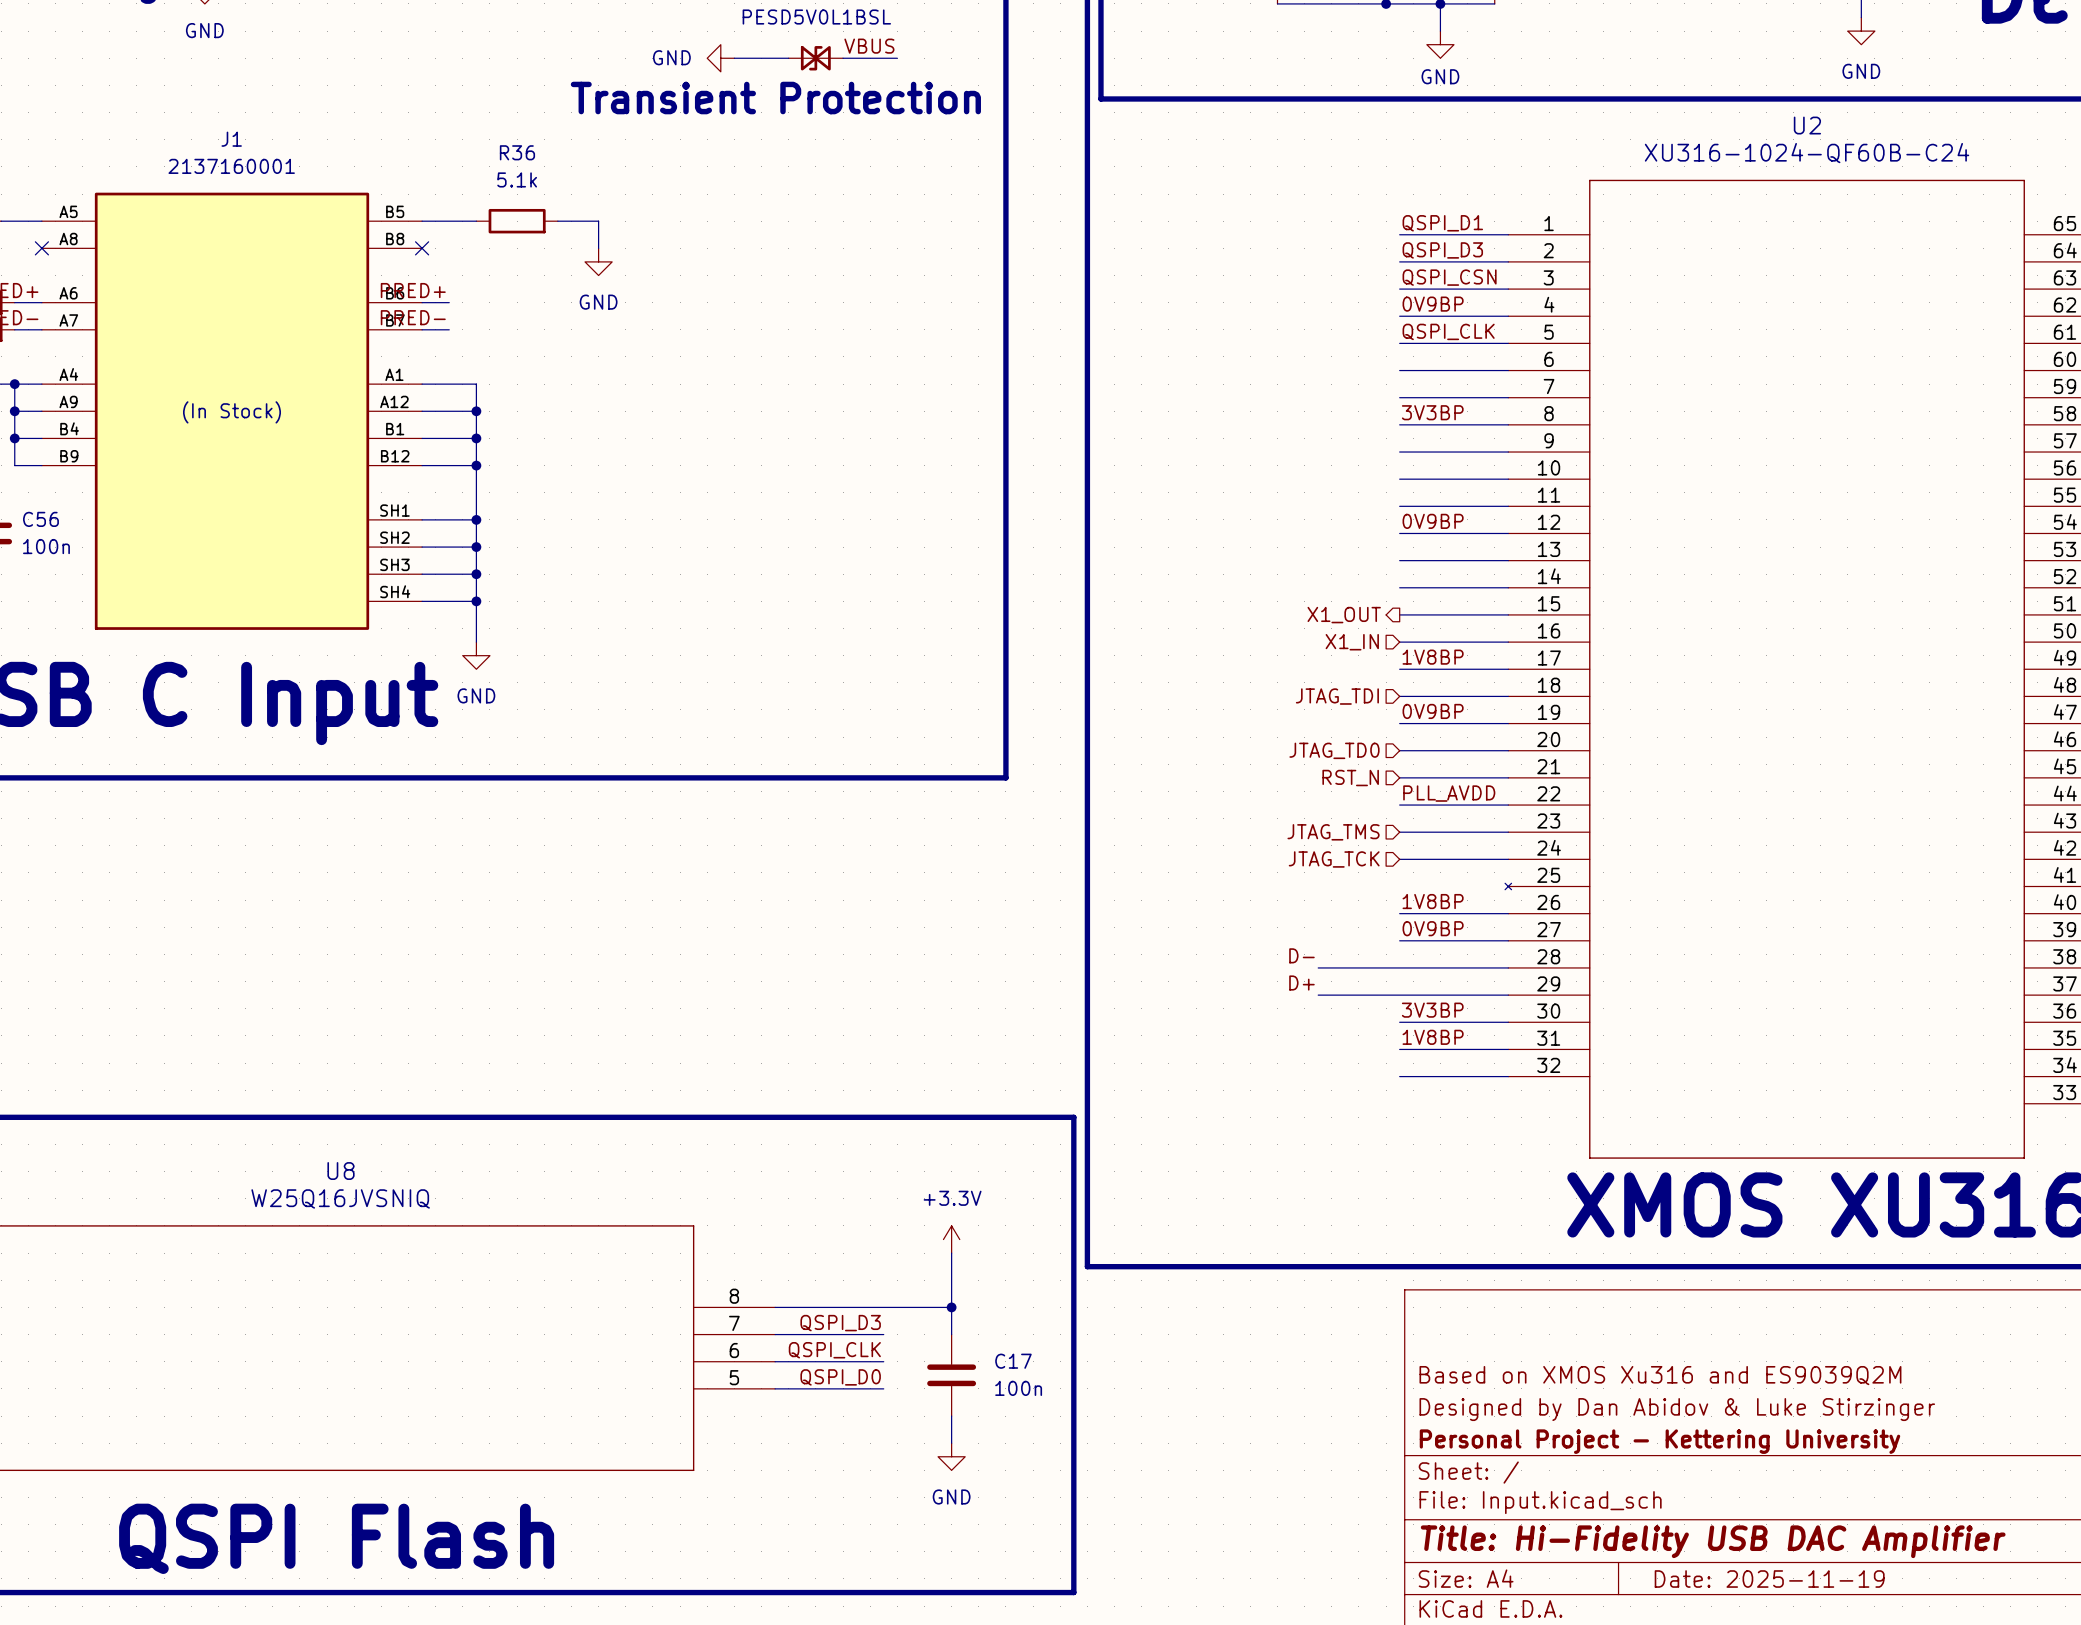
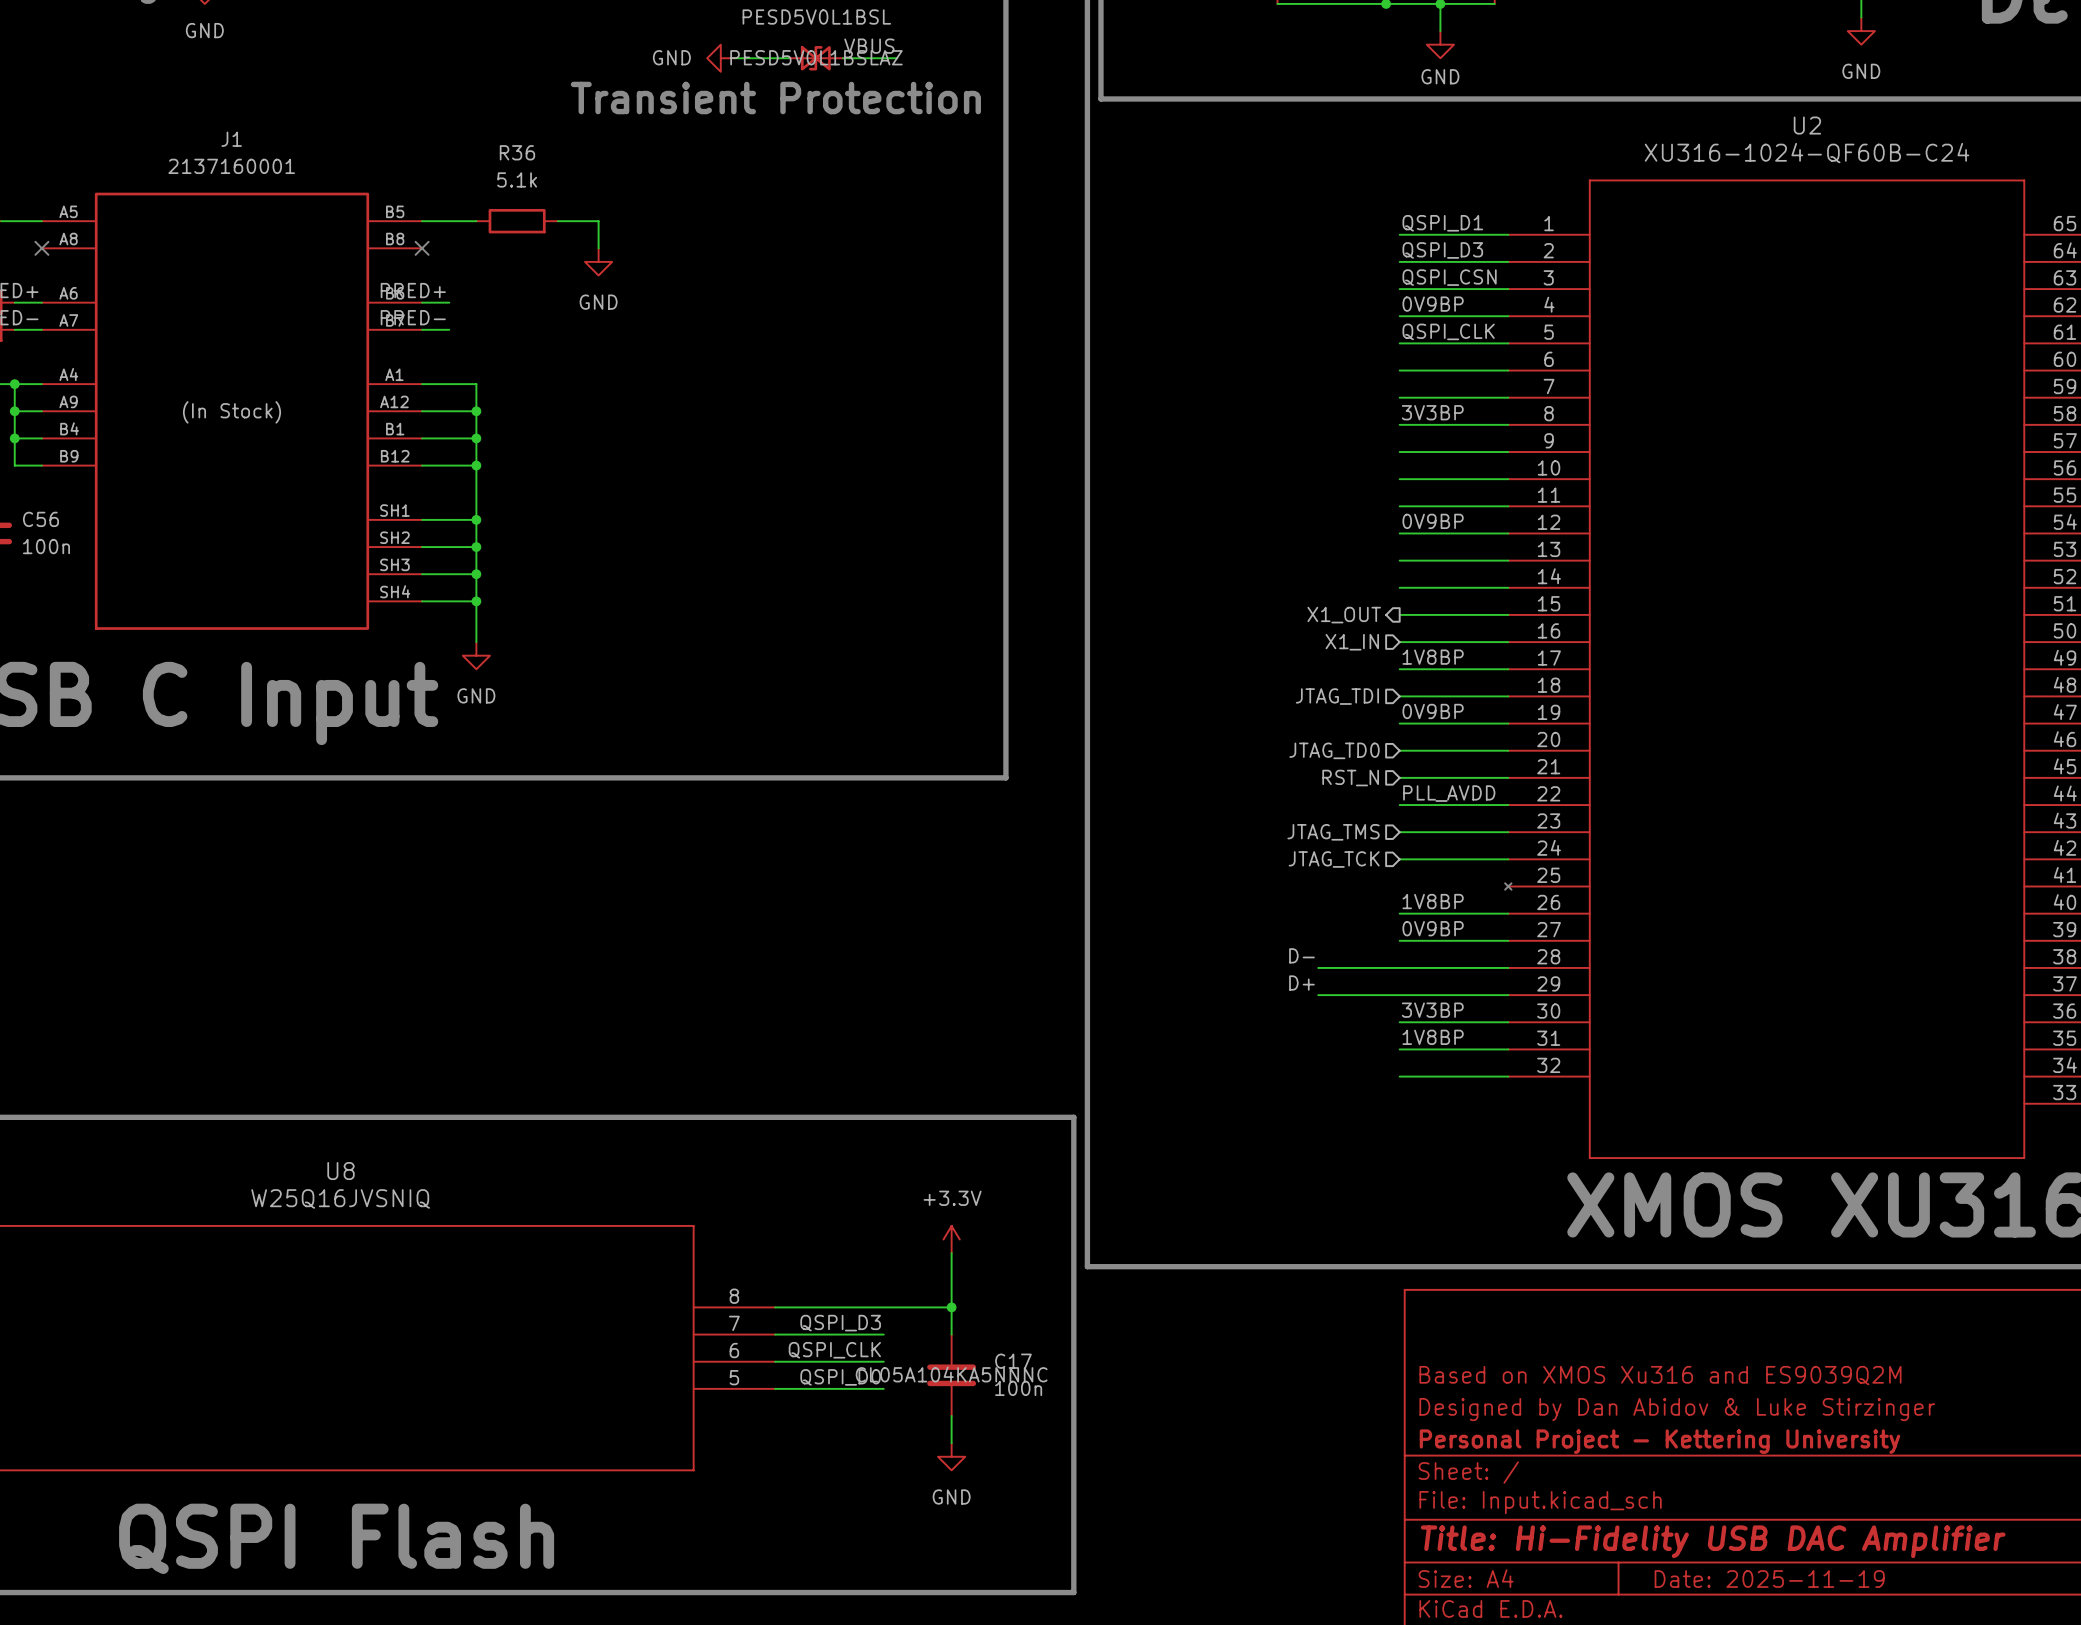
part text: none -> PESD5V0L1BSLAZ (816, 57)
C17 text: none -> CL05A104KA5NNNC (951, 1374)

